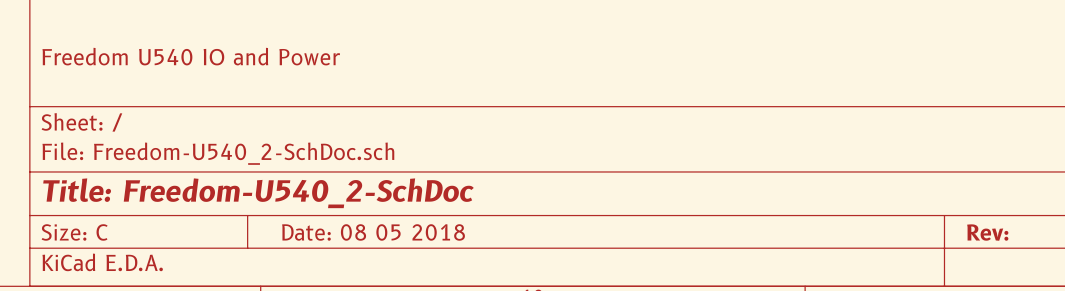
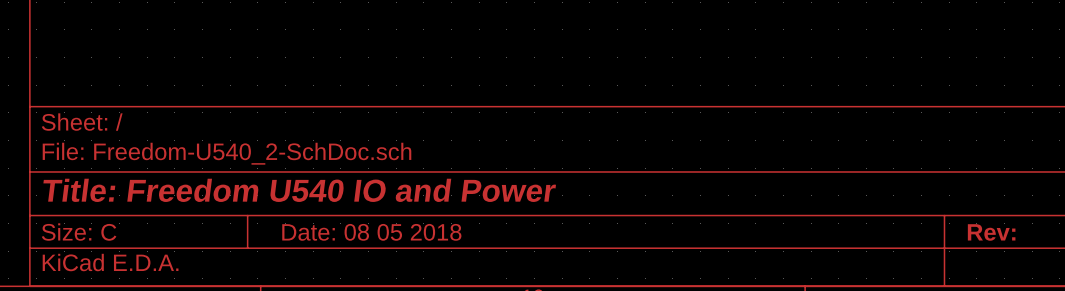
title block: Freedom U540 IO and Power (191, 56) -> none
title block: Title: Freedom-U540_2-SchDoc (258, 193) -> Title: Freedom U540 IO and Power (299, 190)

